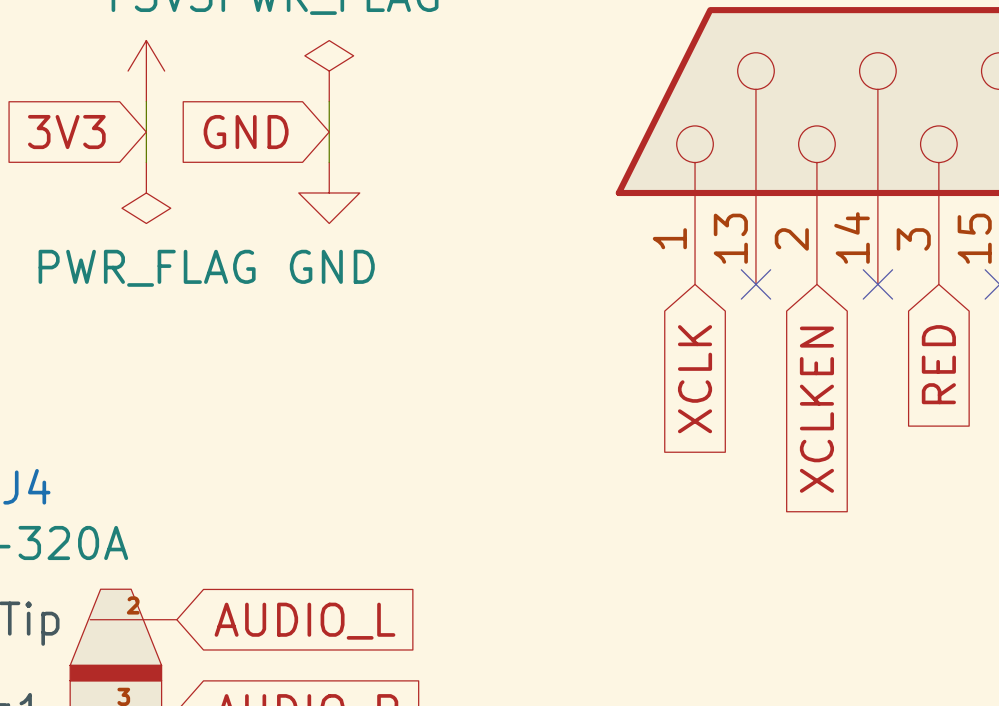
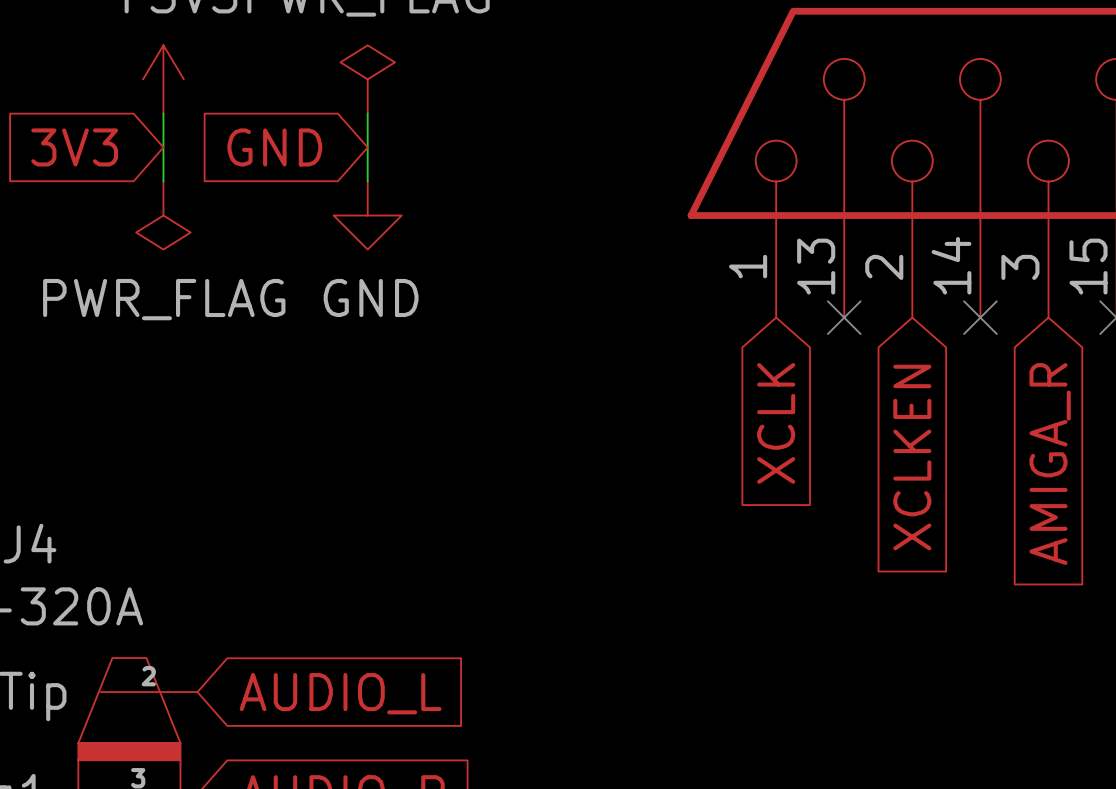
global label: RED (938, 364) -> AMIGA_R (1050, 463)

